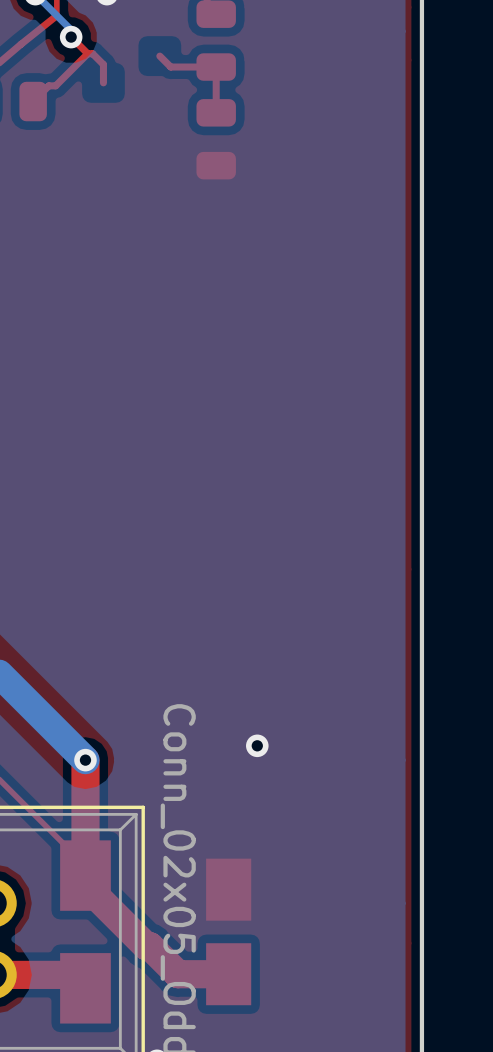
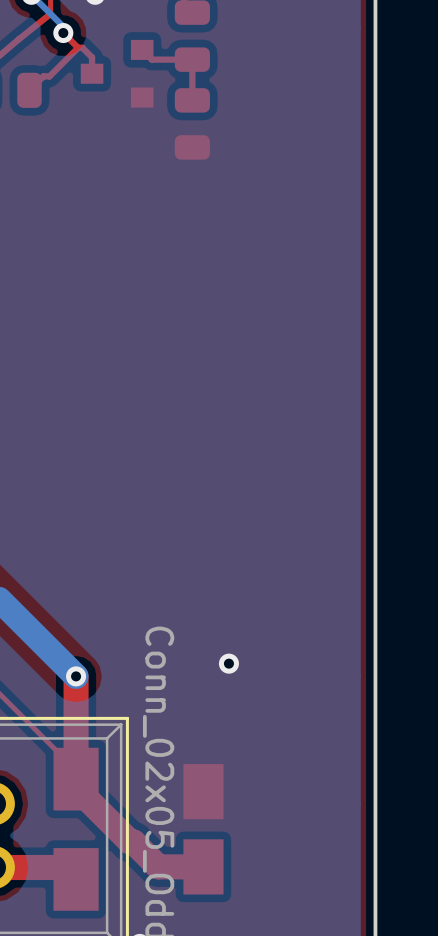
part: none -> (117, 73)

